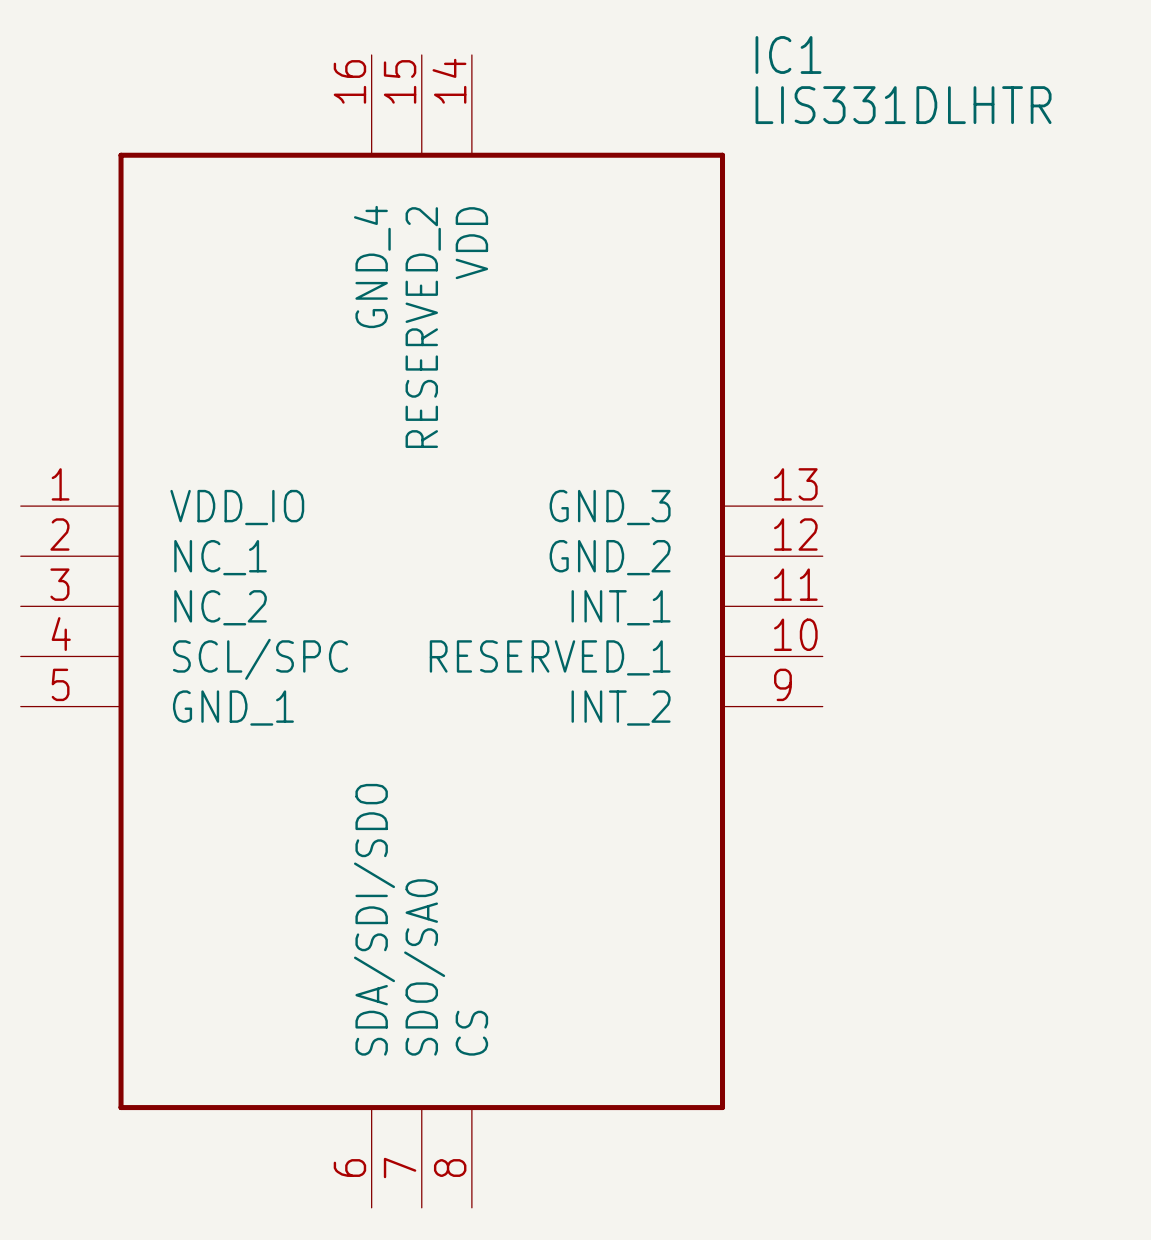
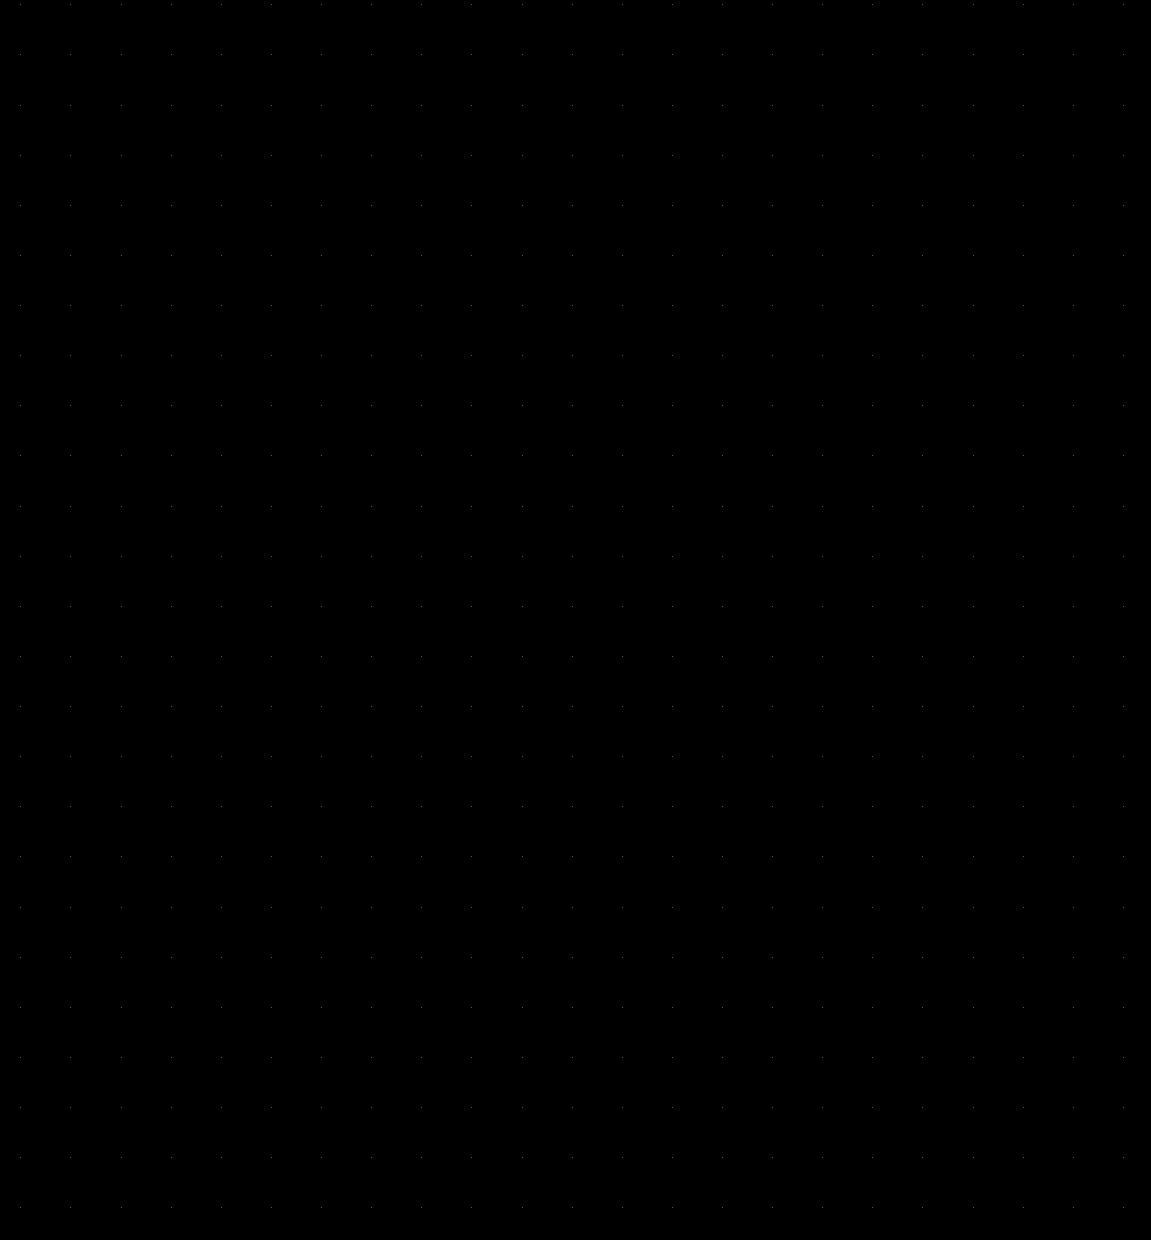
IC1: LIS331DLHTR (421, 631) -> none

